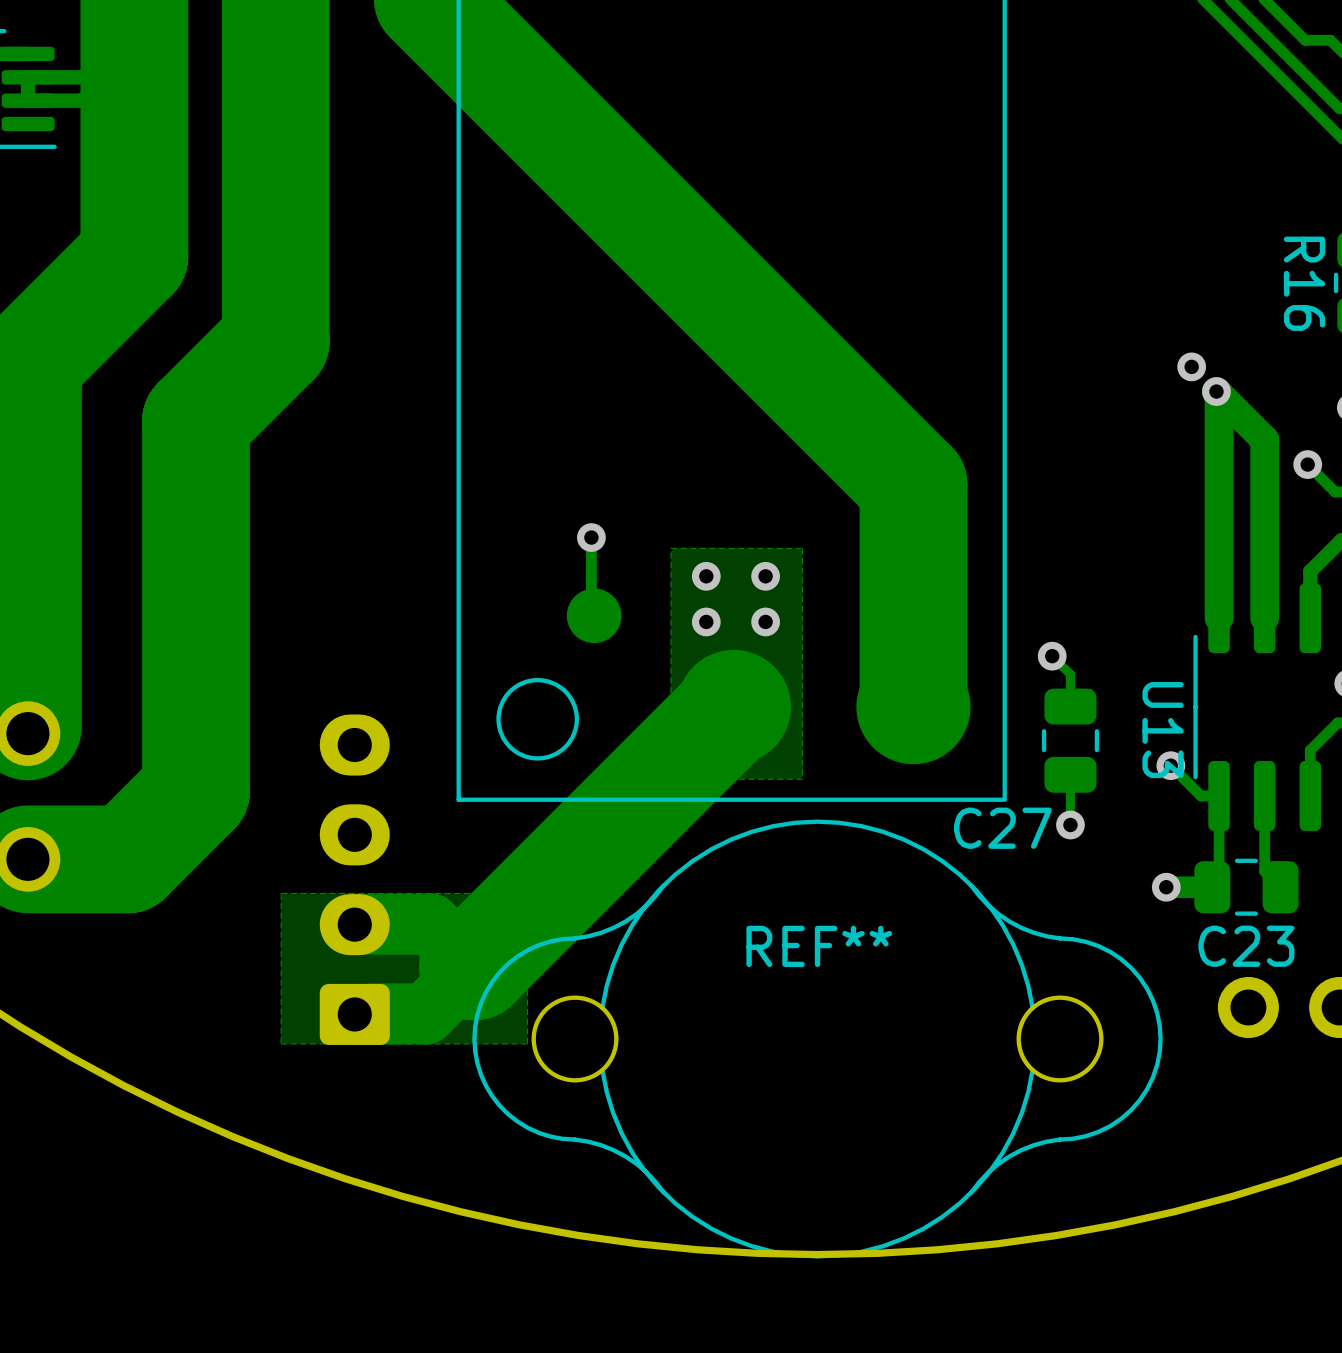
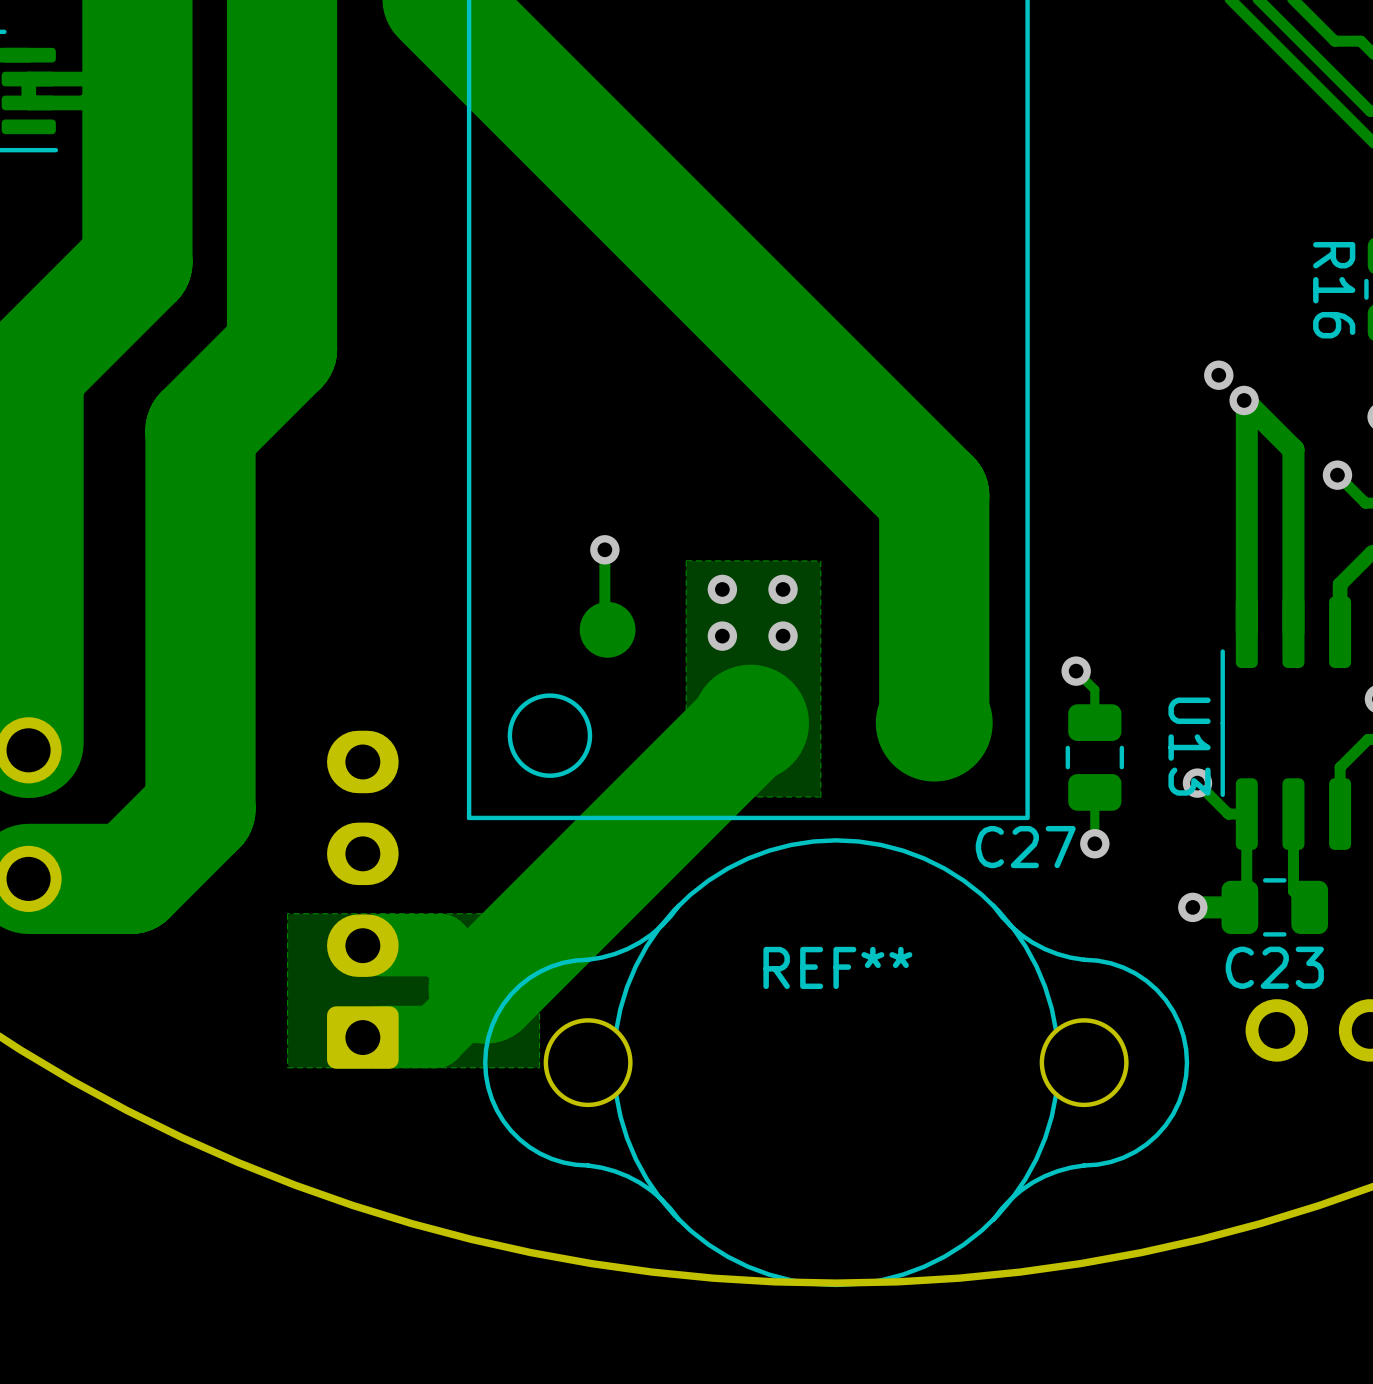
track width: thick (1216, 391) (1264, 439) (1264, 618) -> thin (1244, 400) (1293, 449) (1293, 632)
track width: thick (1219, 394) (1219, 618) -> thin (1246, 403) (1246, 632)

